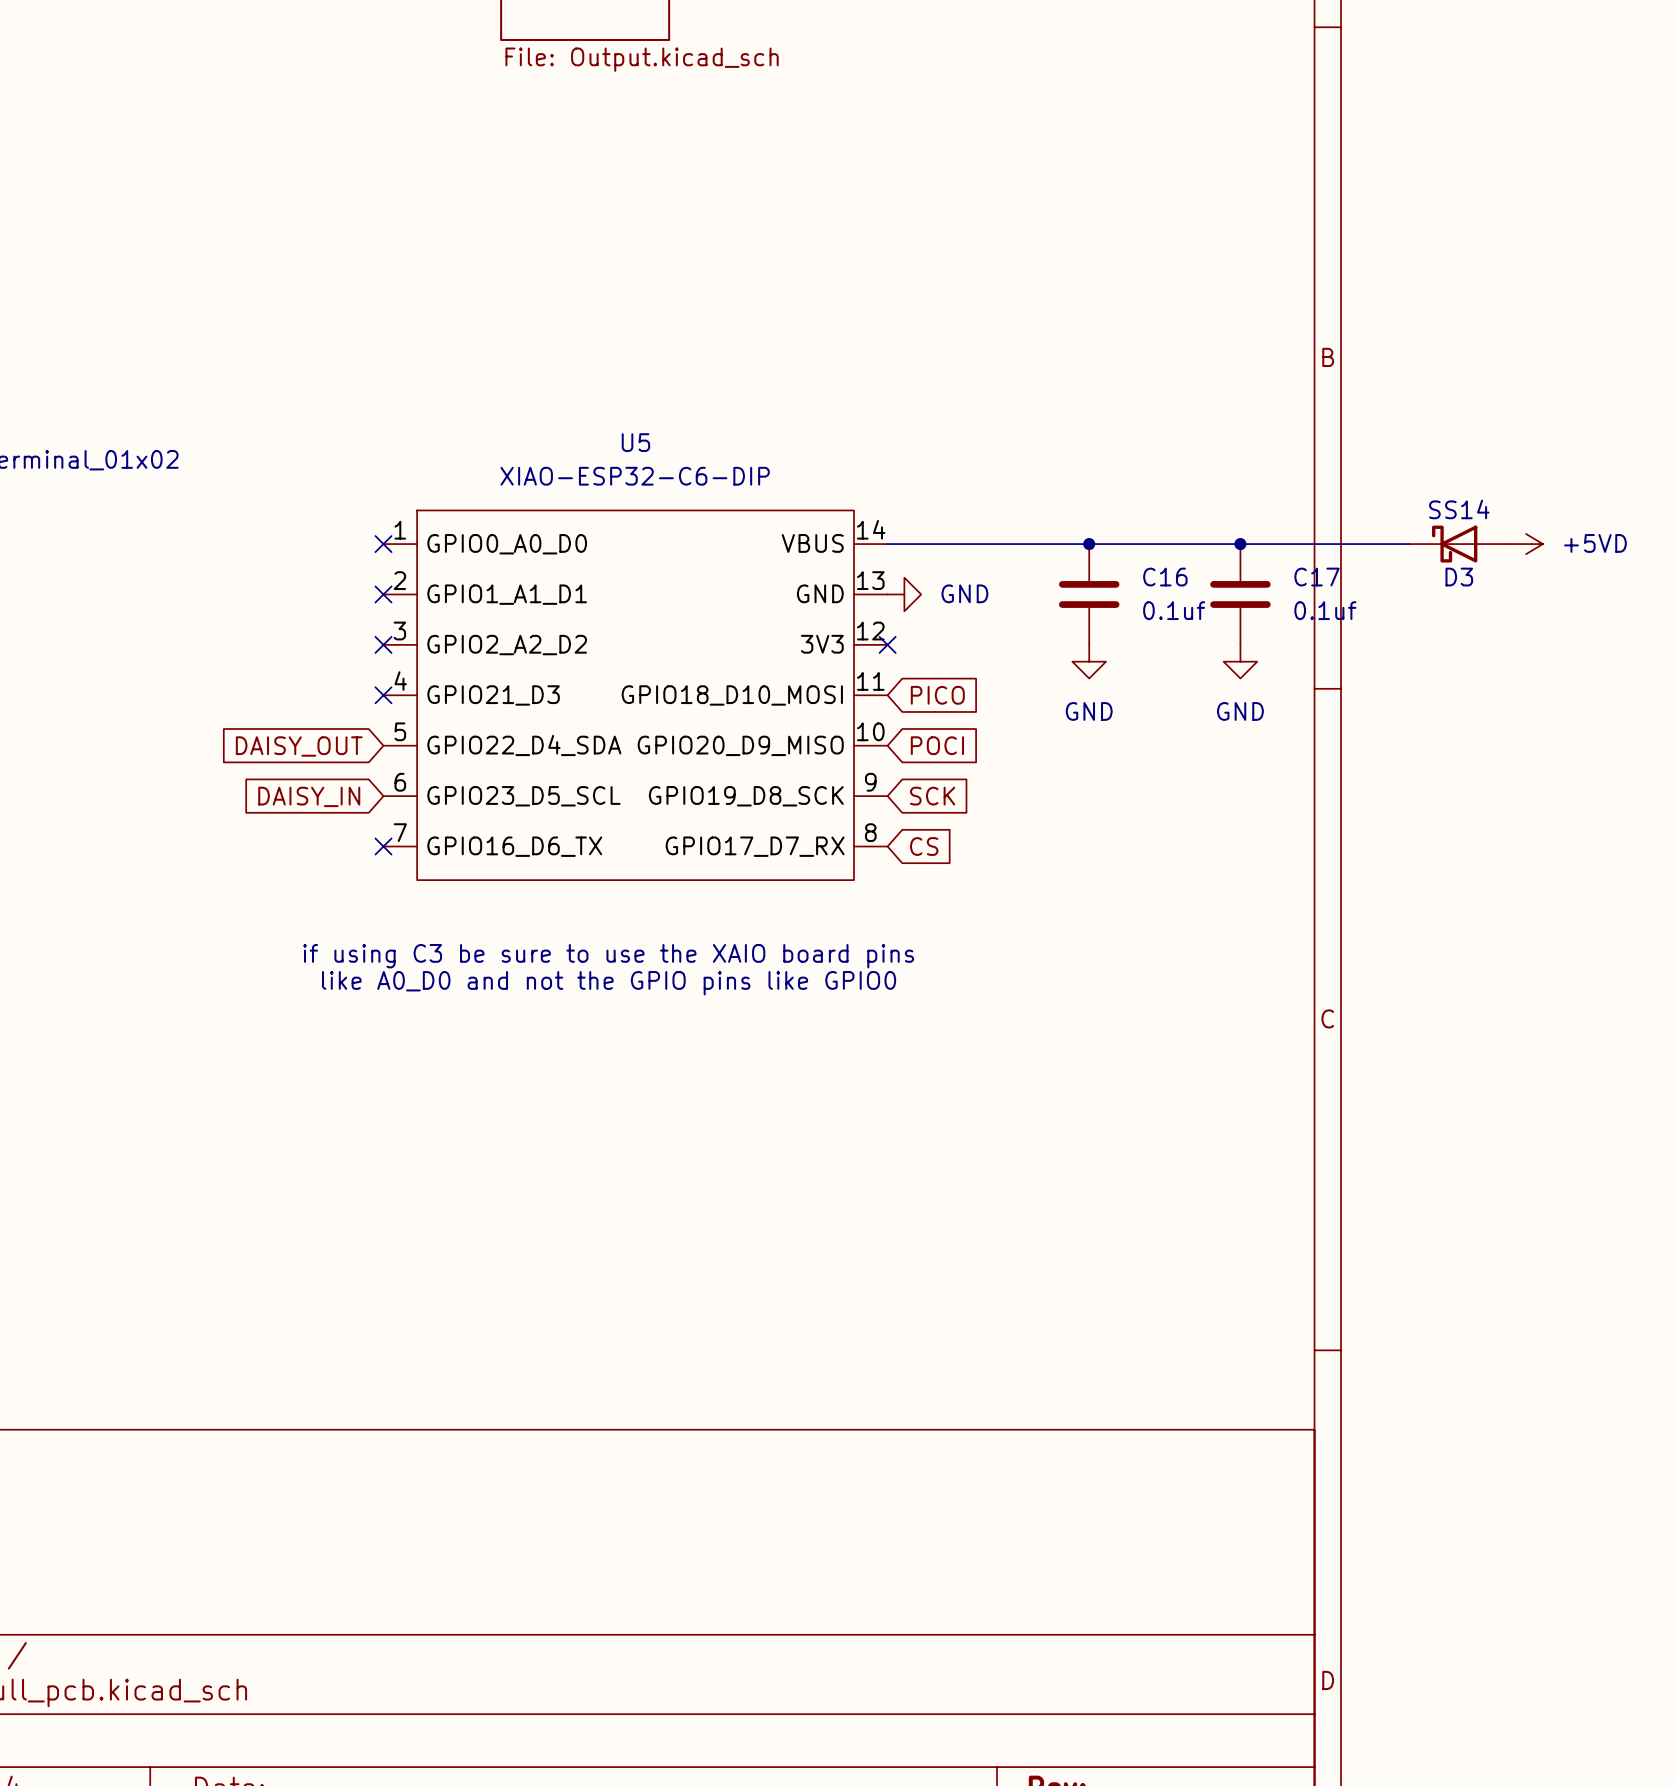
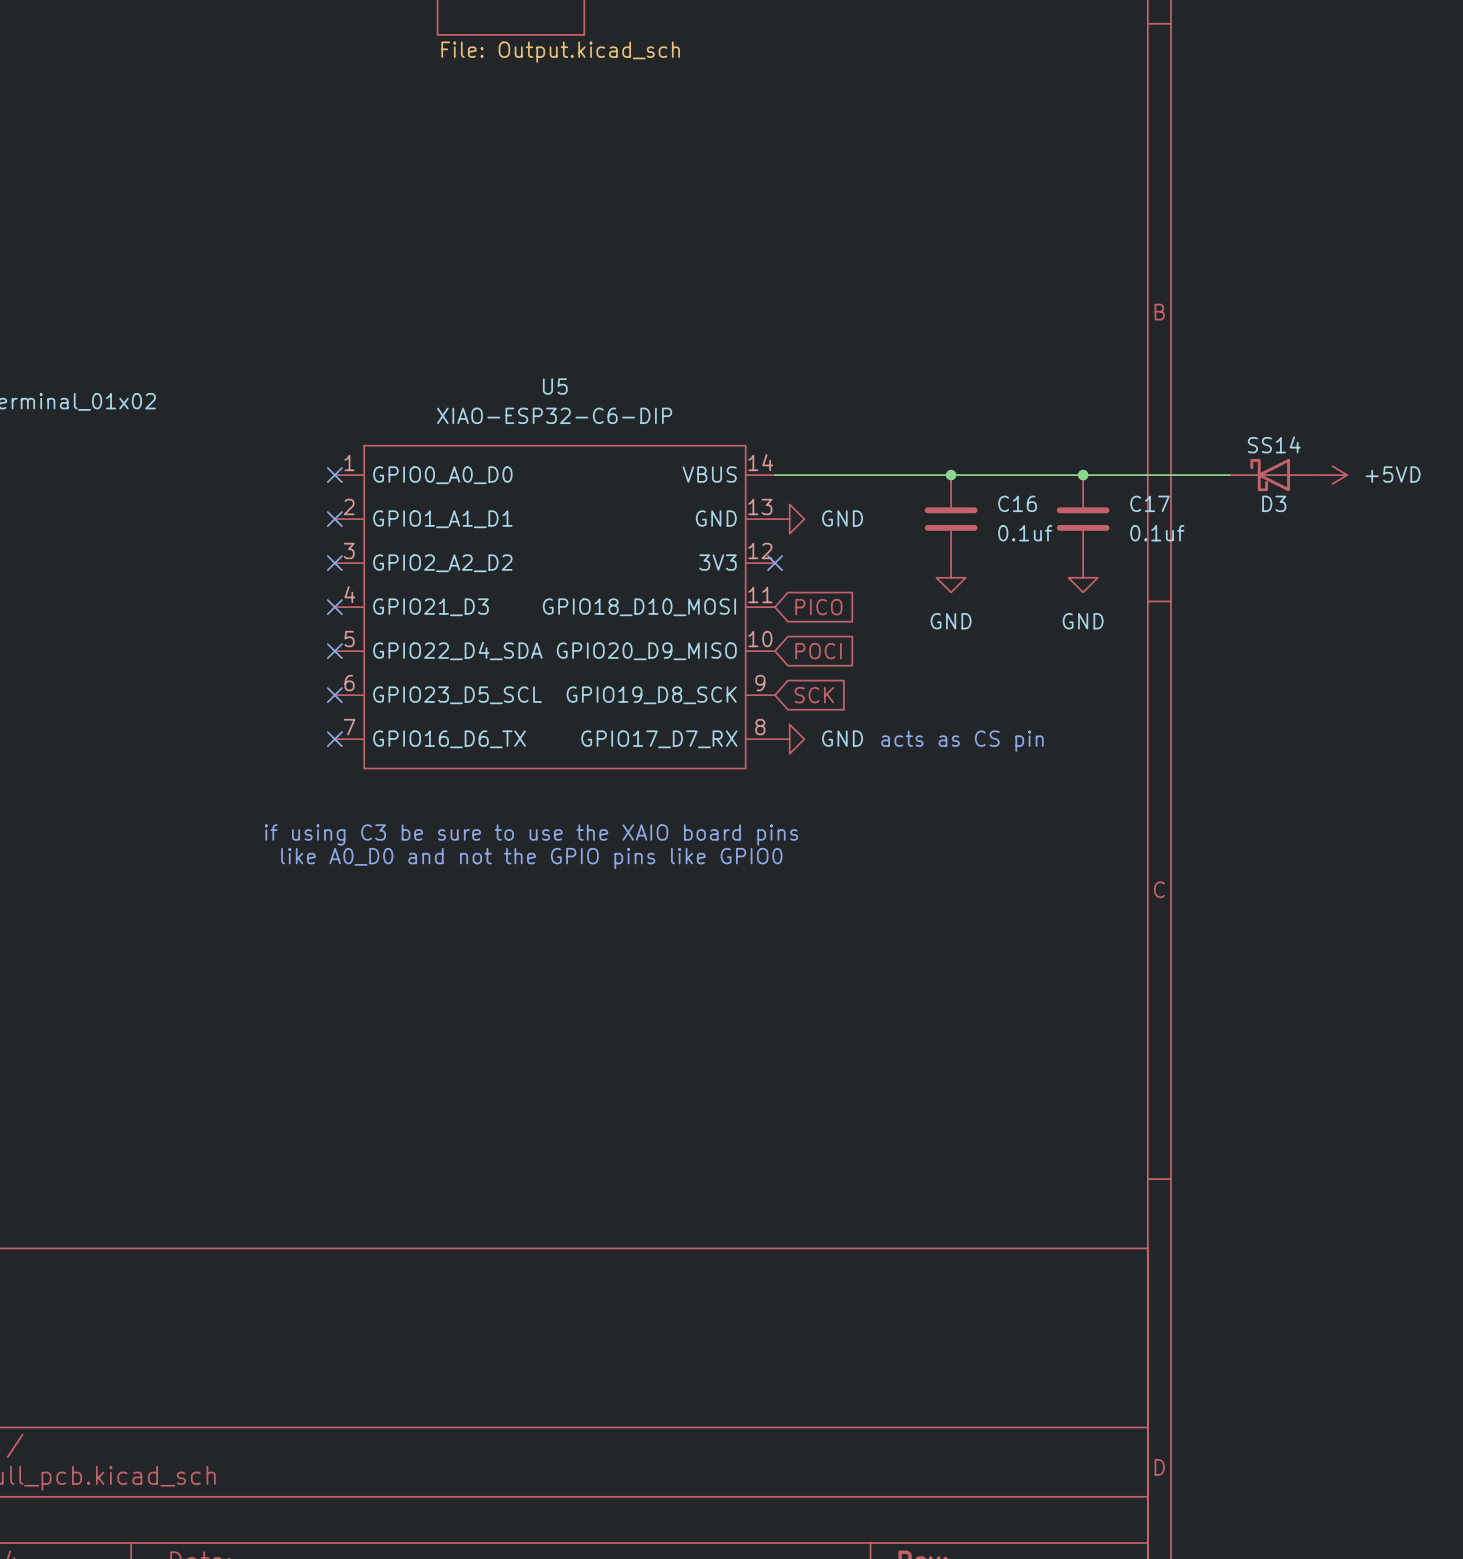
no-connect mark: none -> (334, 651)
global label: DAISY_OUT (299, 746) -> none
global label: DAISY_IN (309, 796) -> none
no-connect mark: none -> (334, 695)
power symbol: none -> GND (789, 739)
global label: CS (924, 846) -> none
text: none -> acts as CS pin (962, 741)

